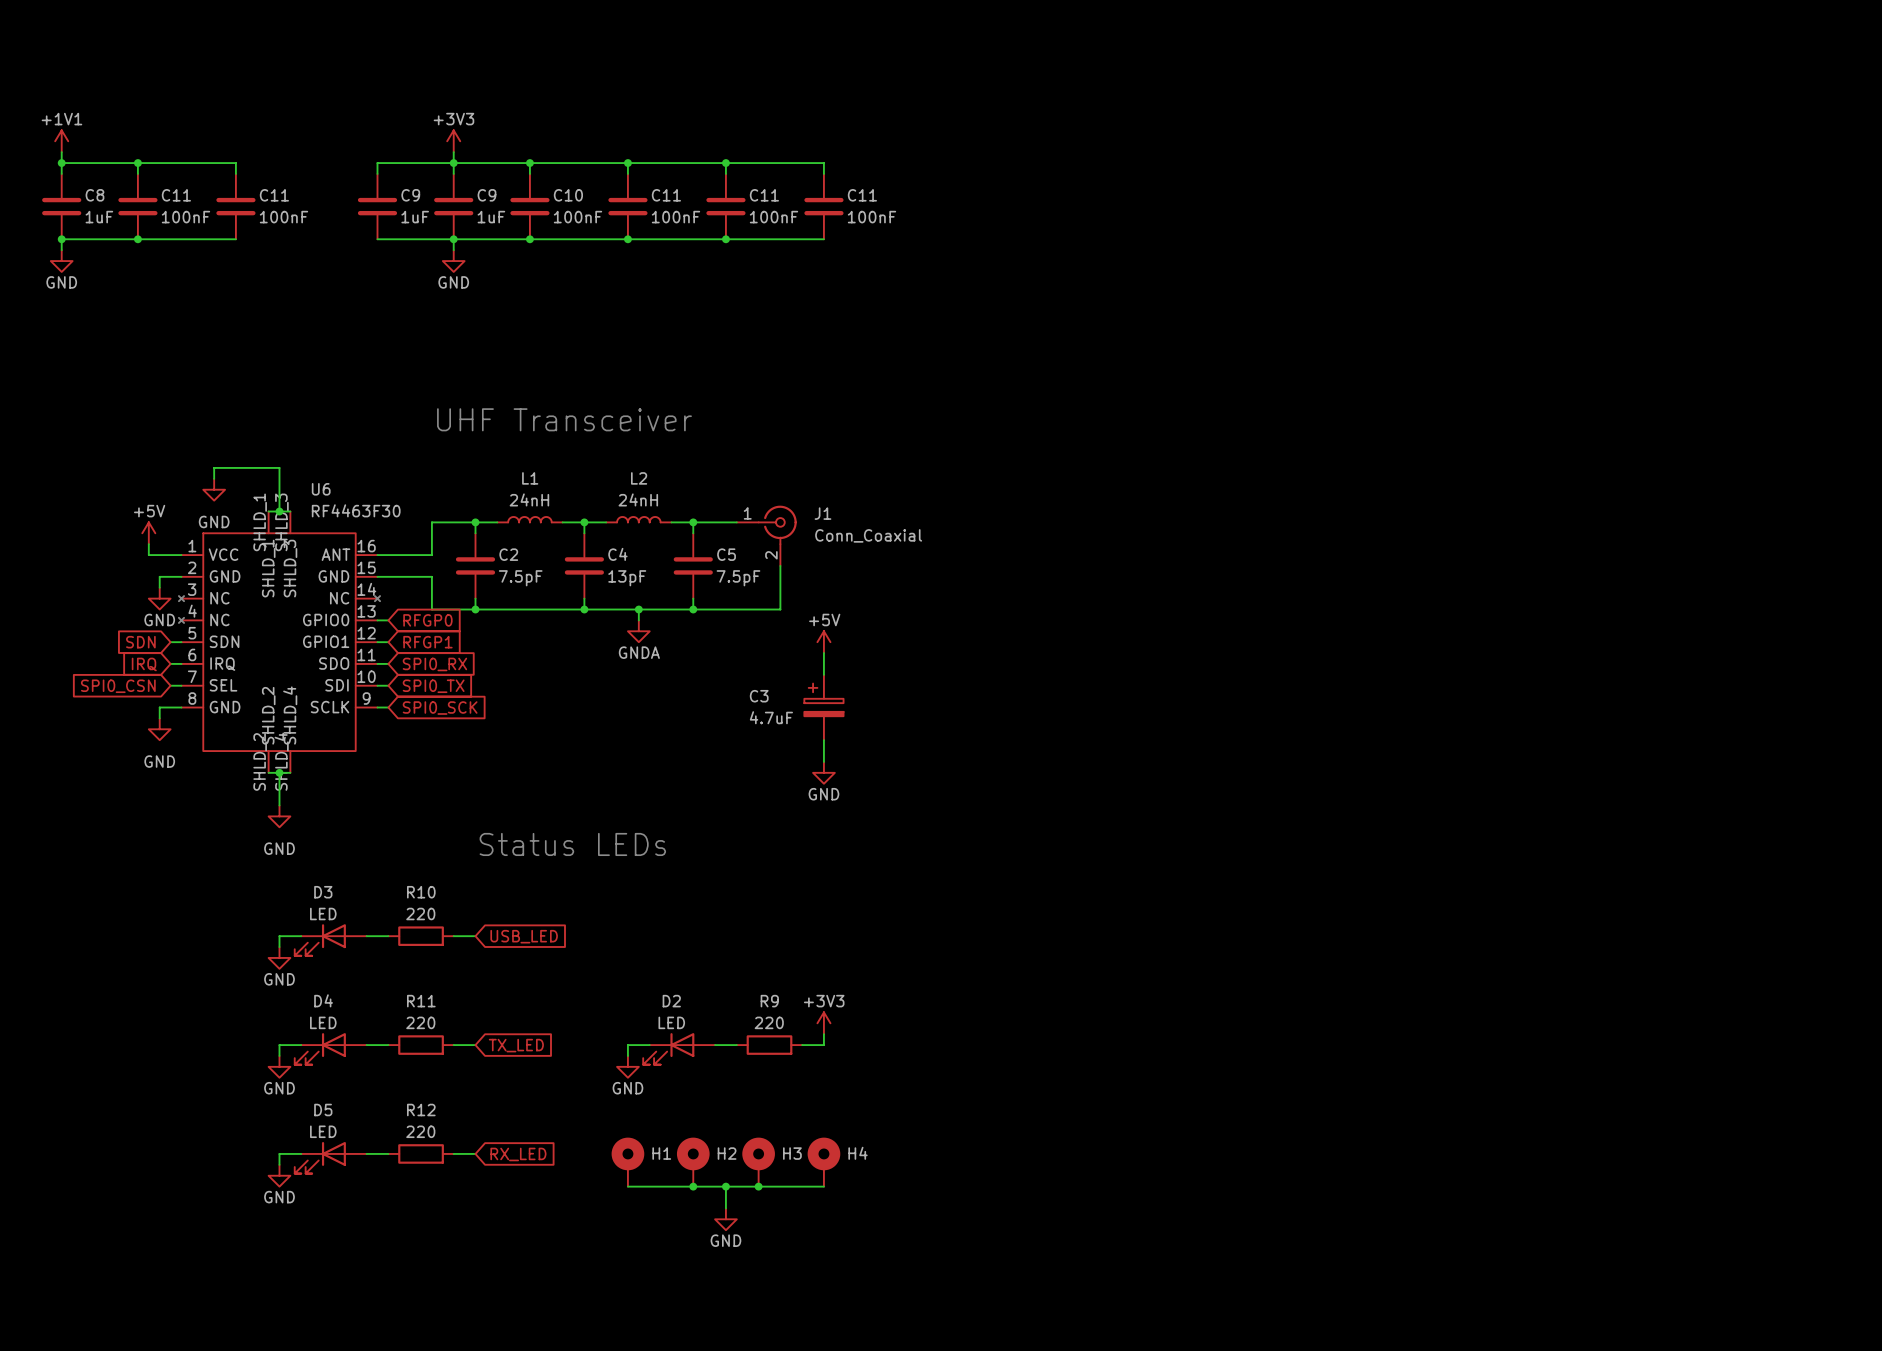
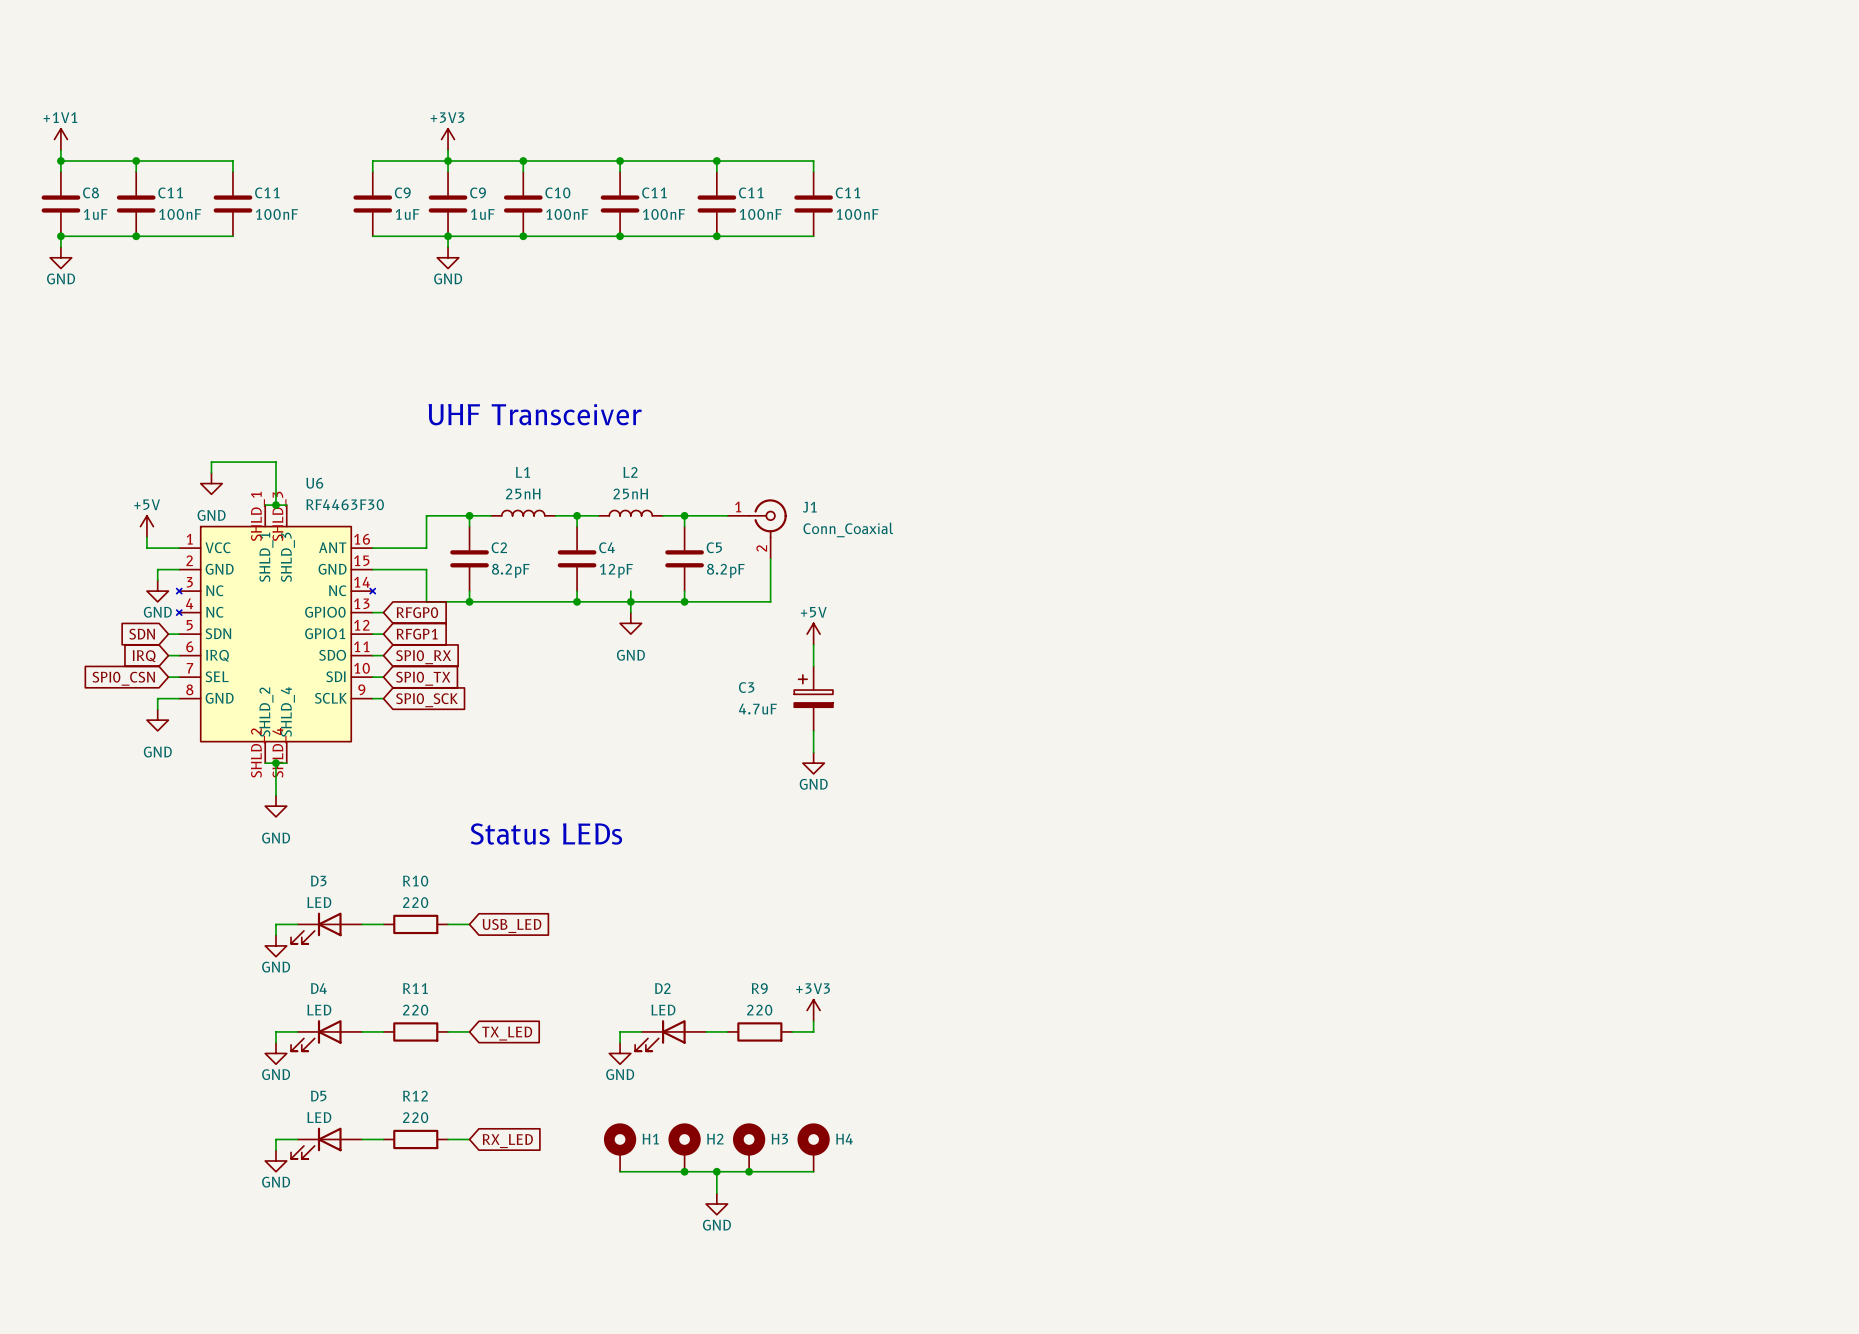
L1 value: 24nH (529, 499) -> 25nH (523, 493)
L2 value: 24nH (638, 499) -> 25nH (630, 493)
C2 value: 7.5pF (520, 578) -> 8.2pF (510, 570)
C4 value: 13pF (627, 578) -> 12pF (616, 570)
C5 value: 7.5pF (738, 578) -> 8.2pF (725, 570)
wire: none -> (630, 591) (630, 601)
power symbol: GNDA (638, 631) -> GND (630, 623)

